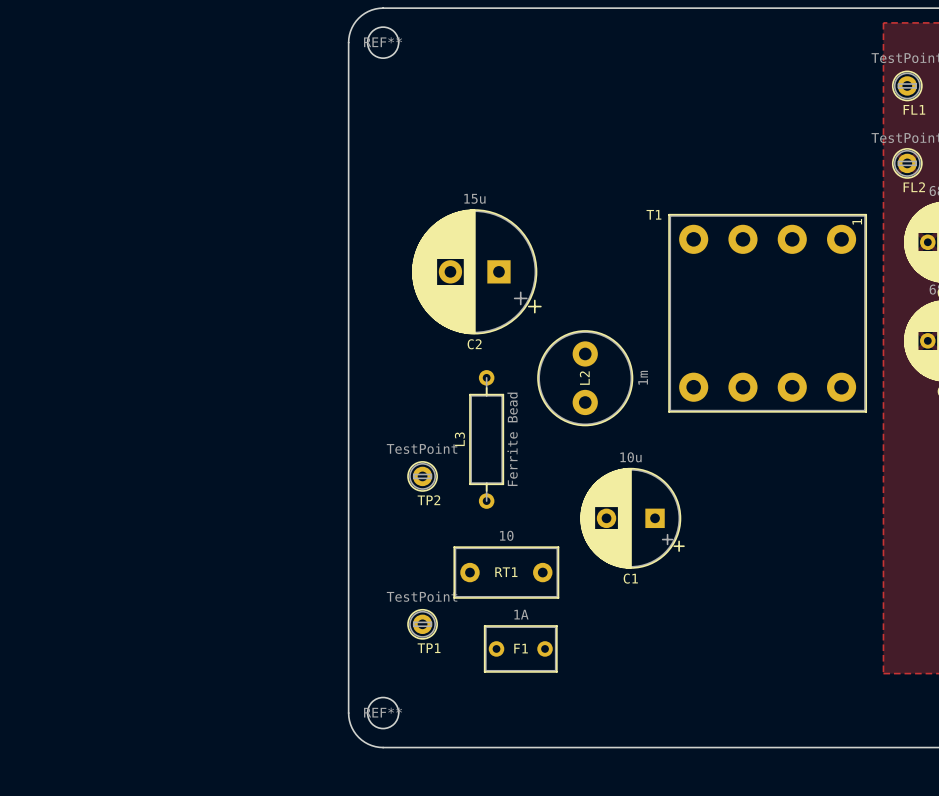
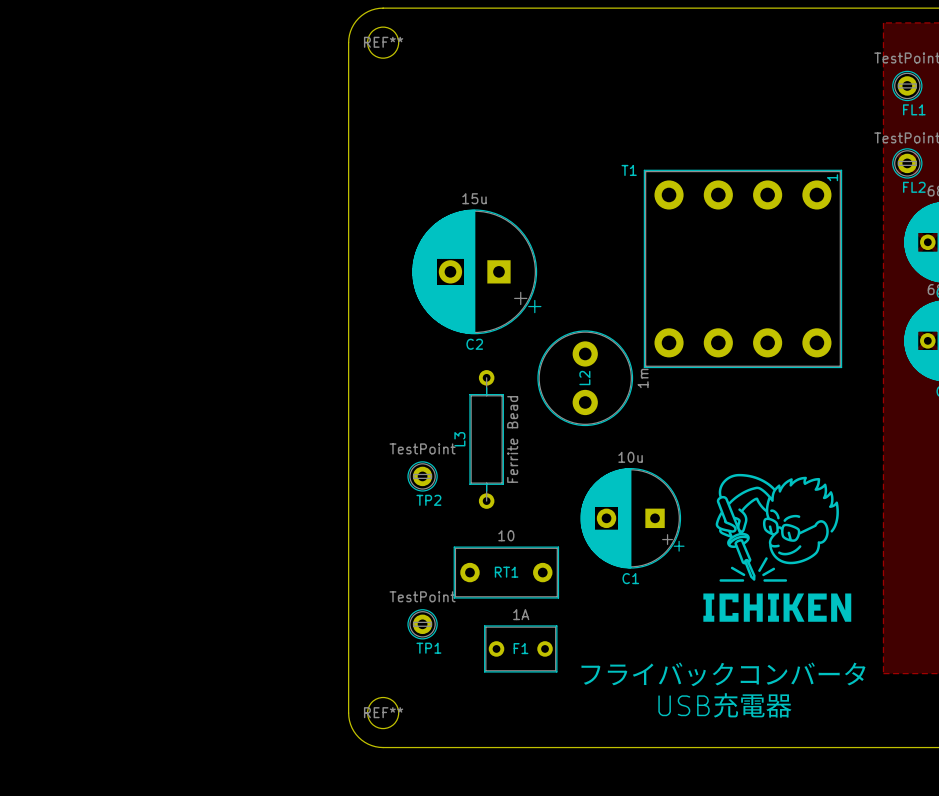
T1 position: (767, 313) -> (742, 268)
drawing: none -> [715, 473, 839, 582]
drawing: none -> [703, 593, 852, 622]
text: none -> フライバックコンバータ (723, 674)
text: none -> USB充電器 (725, 705)

